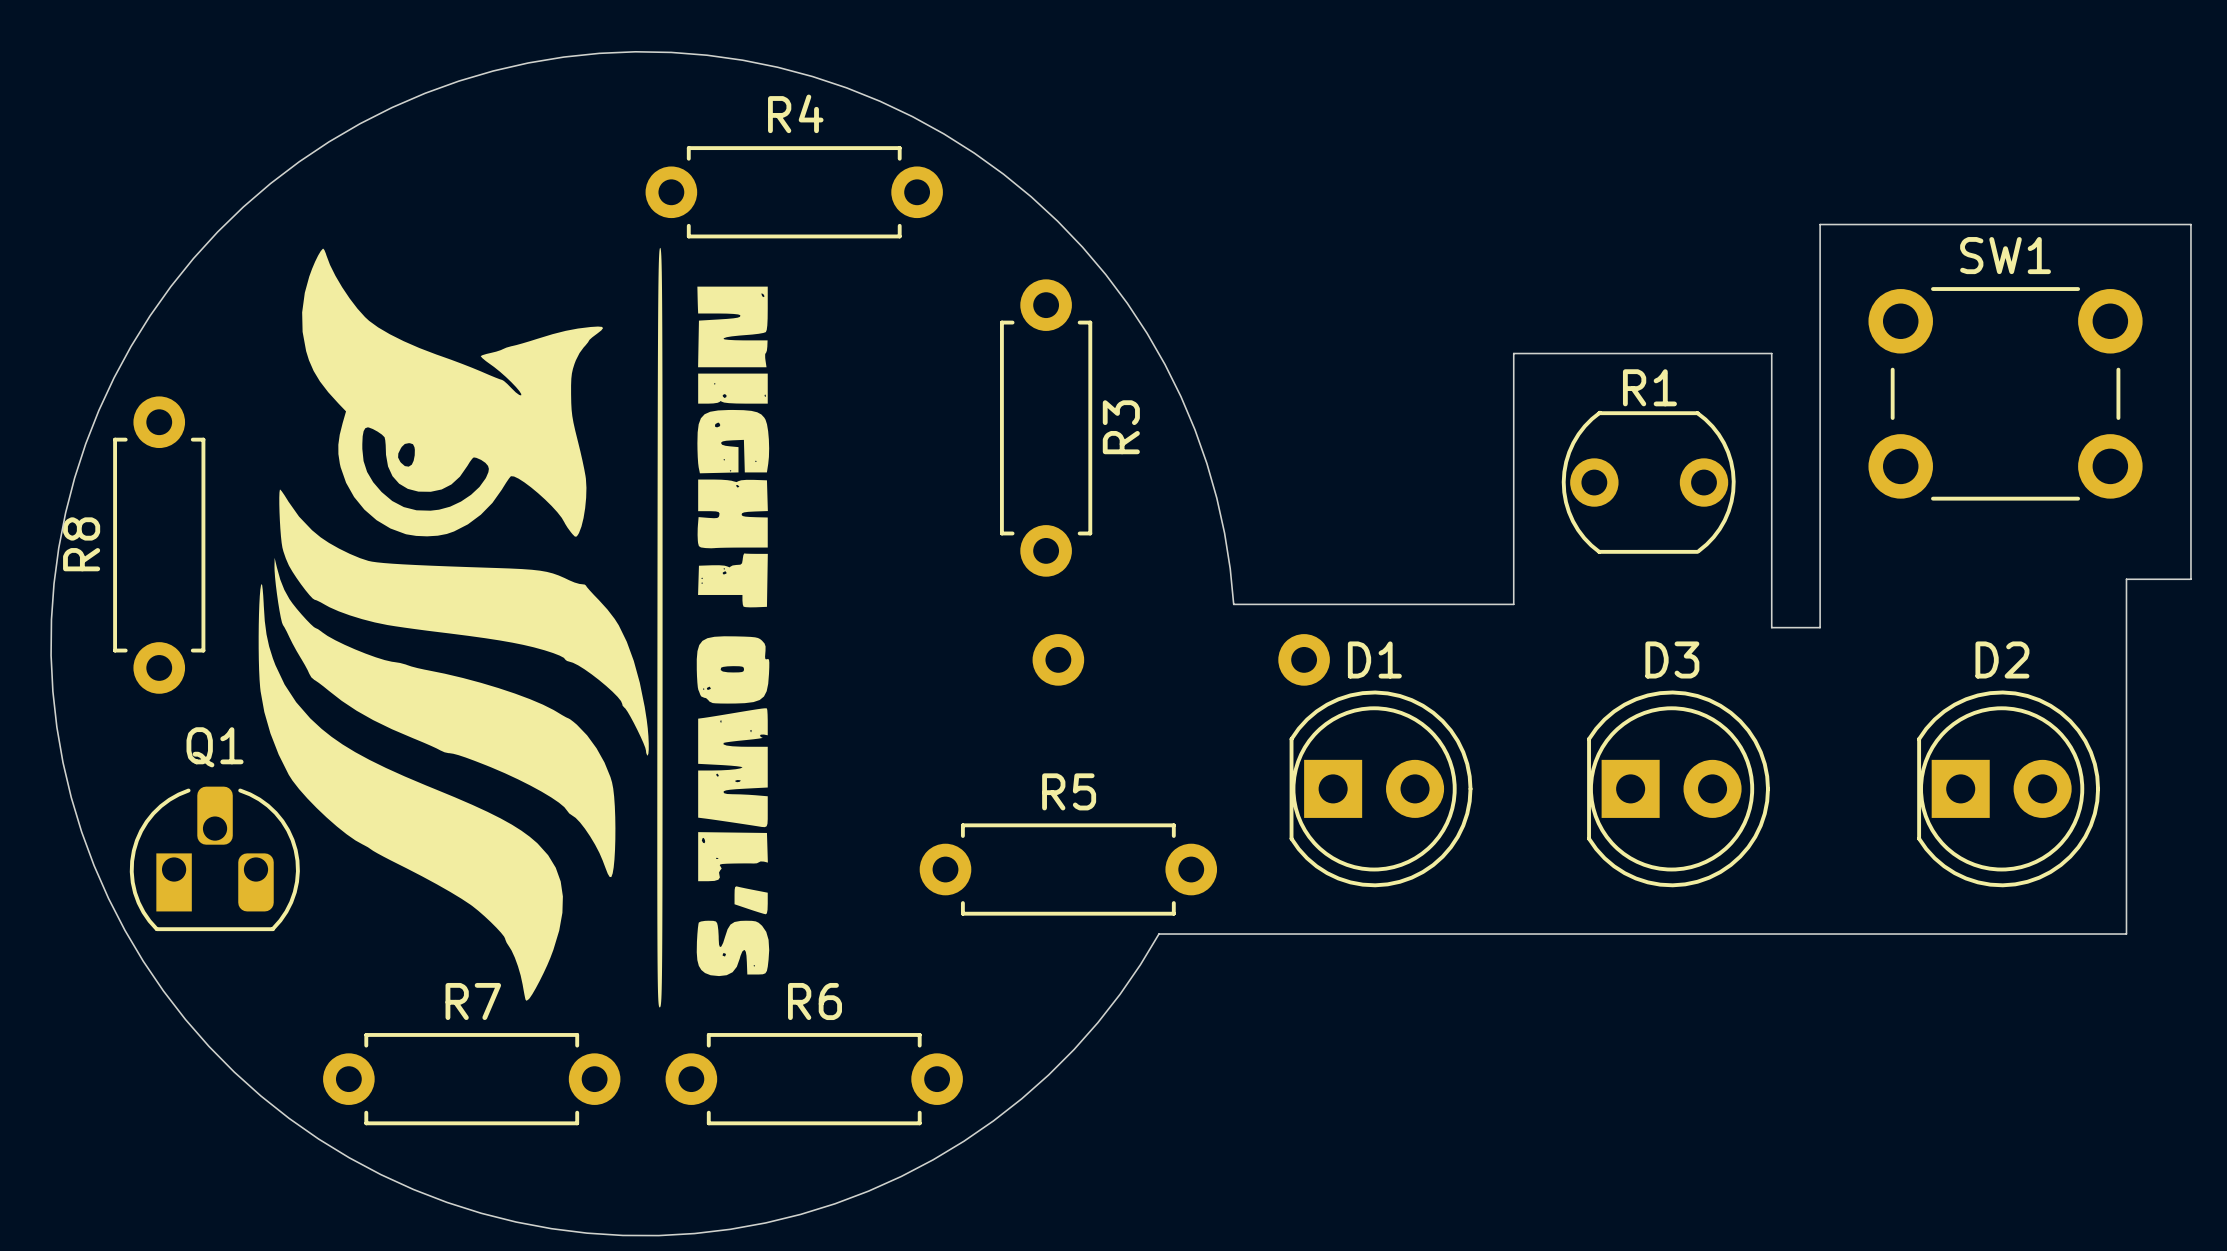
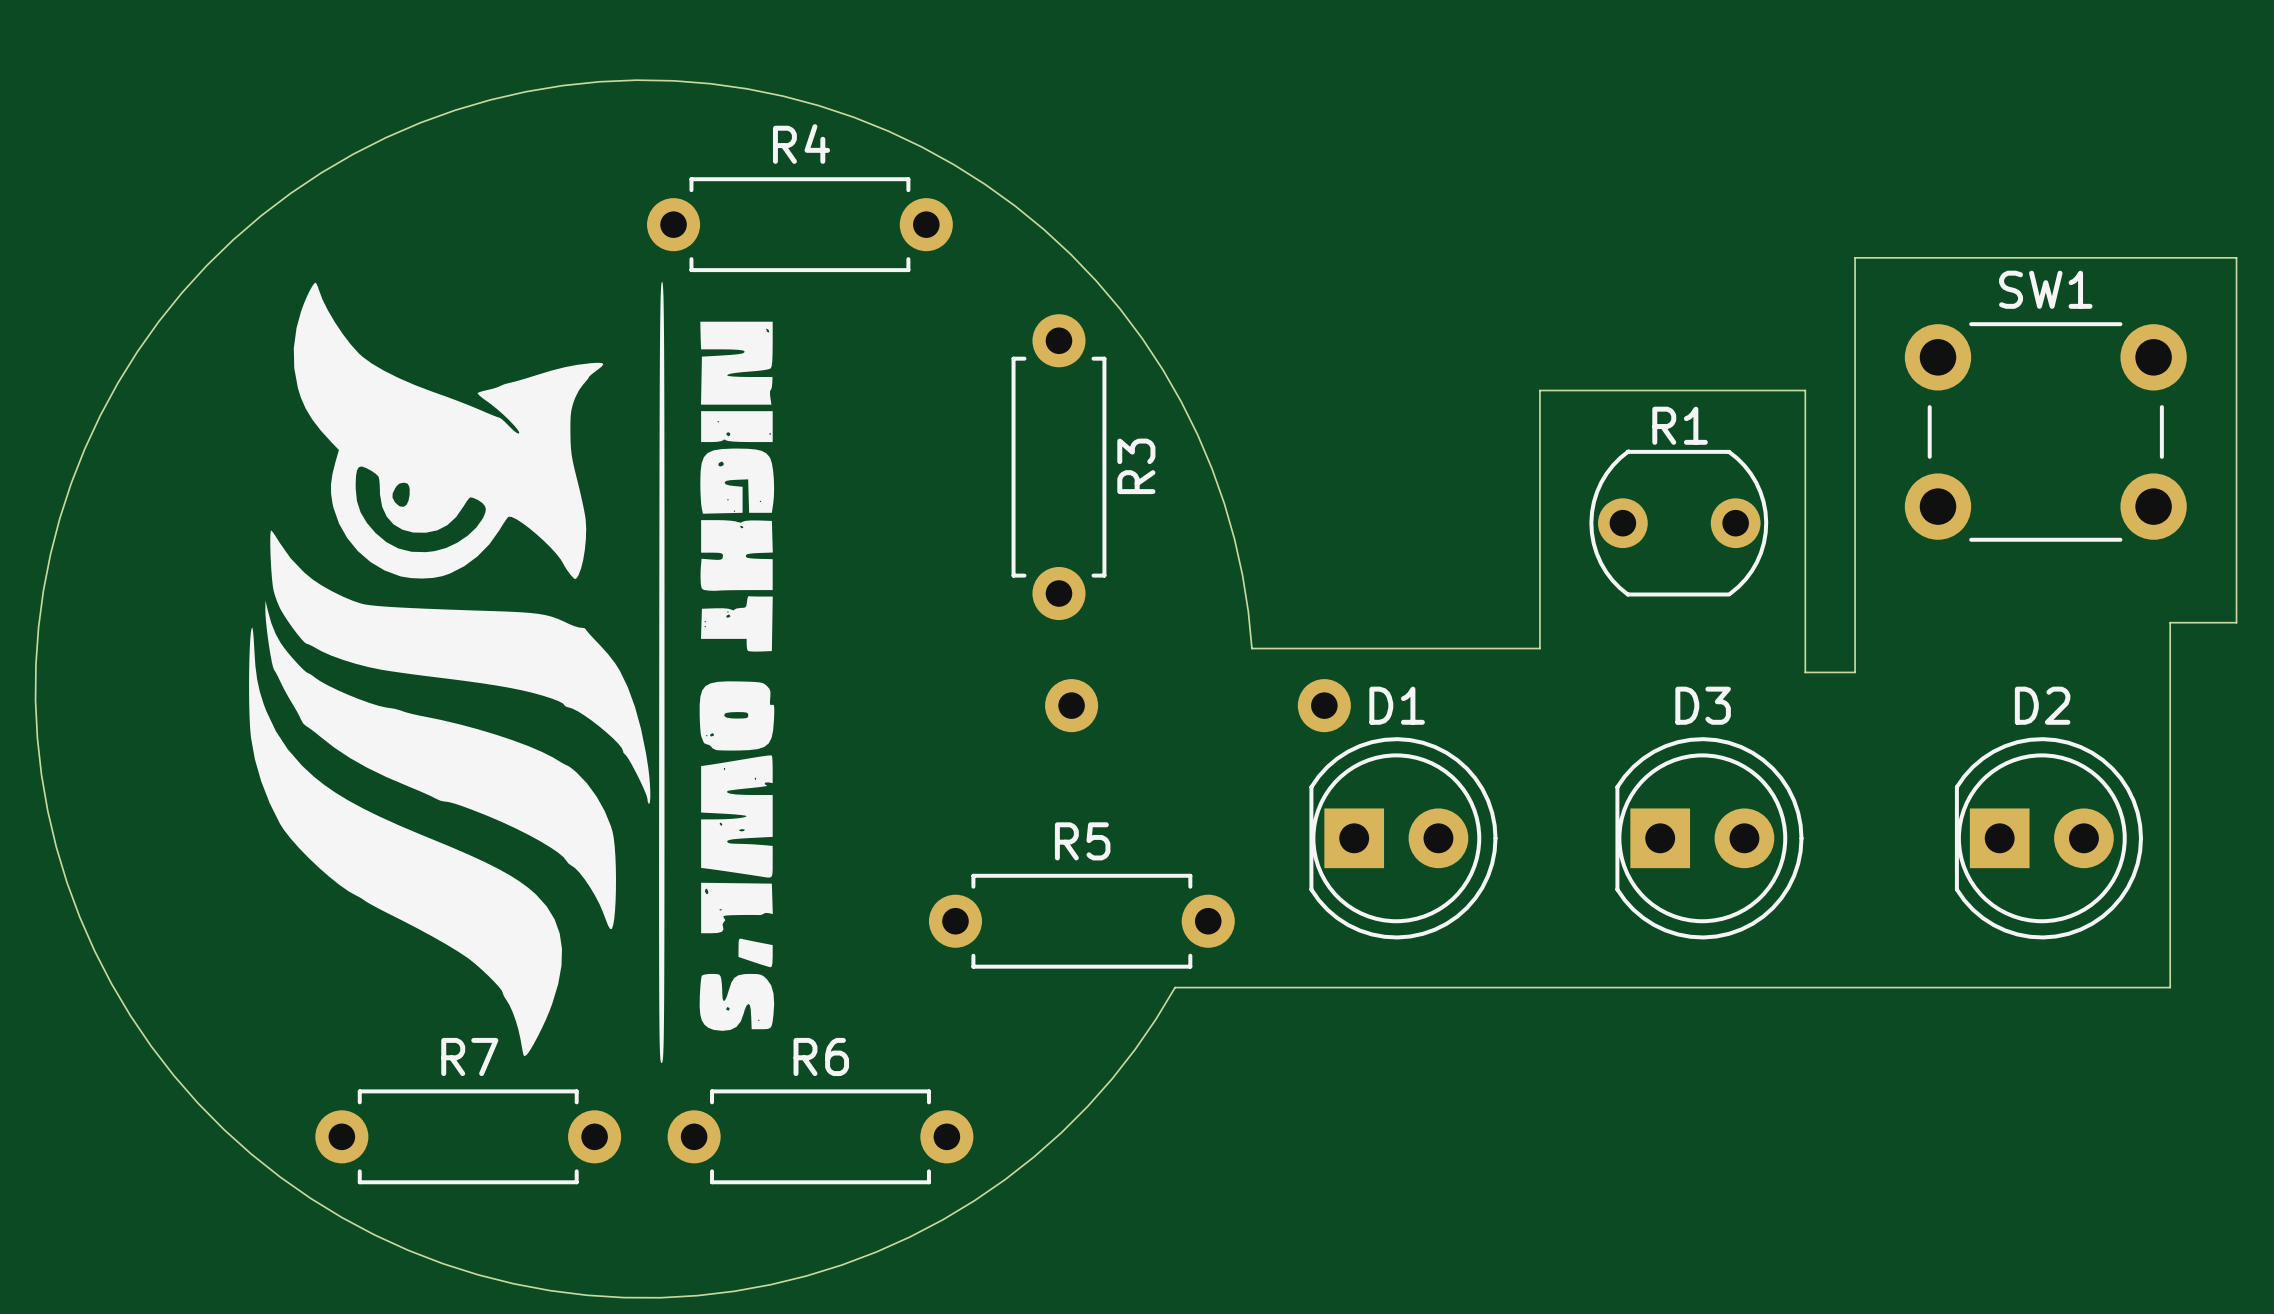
R8: (159, 545) -> none
Q1: (214, 858) -> none

